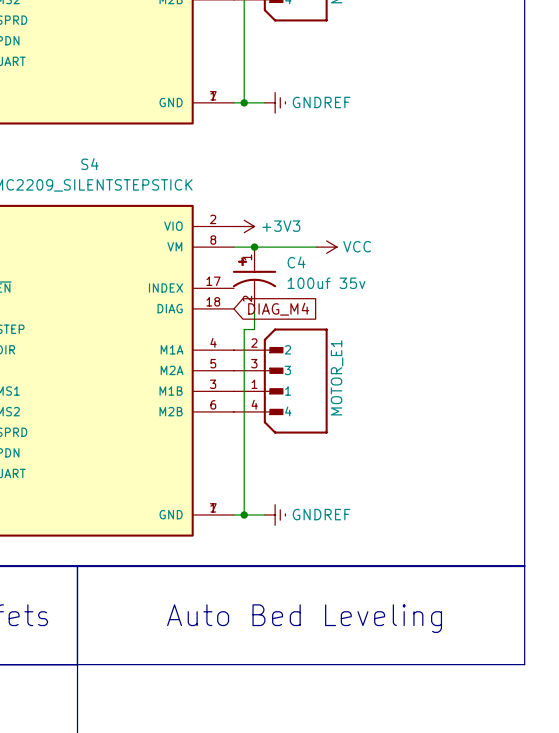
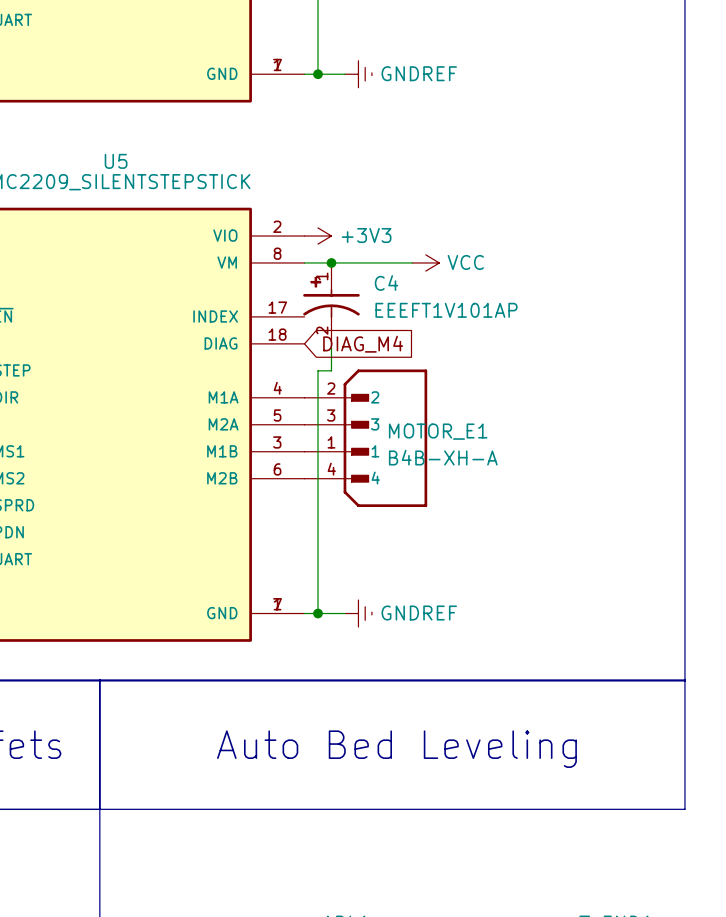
S4 name: S4 (89, 164) -> U5 (116, 161)
C4 value: 100uf 35v (326, 283) -> EEEFT1V101AP (446, 310)
MOTOR_E1 name rotation: 0° (337, 377) -> 90° clockwise (438, 431)
MOTOR_E1 value: none -> B4B-XH-A (443, 457)

